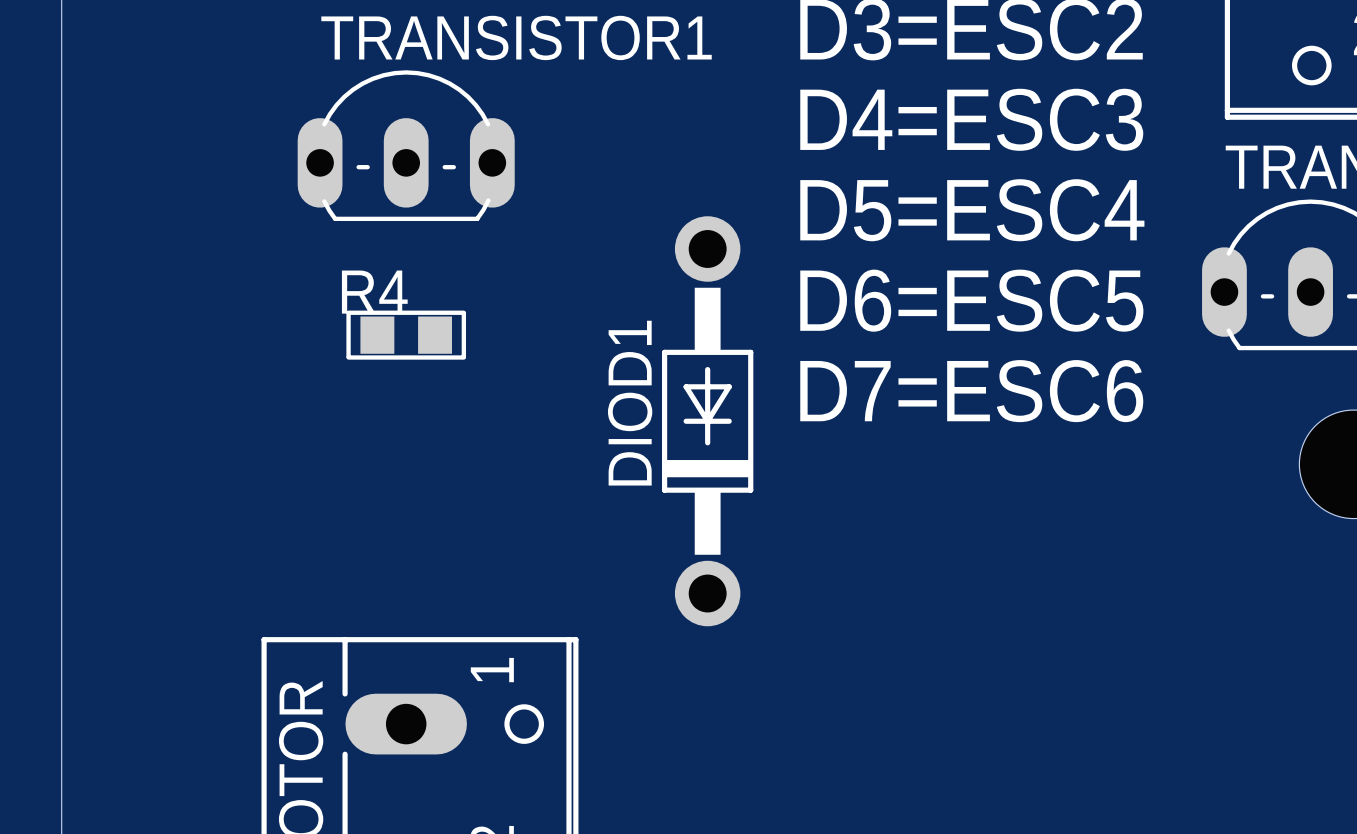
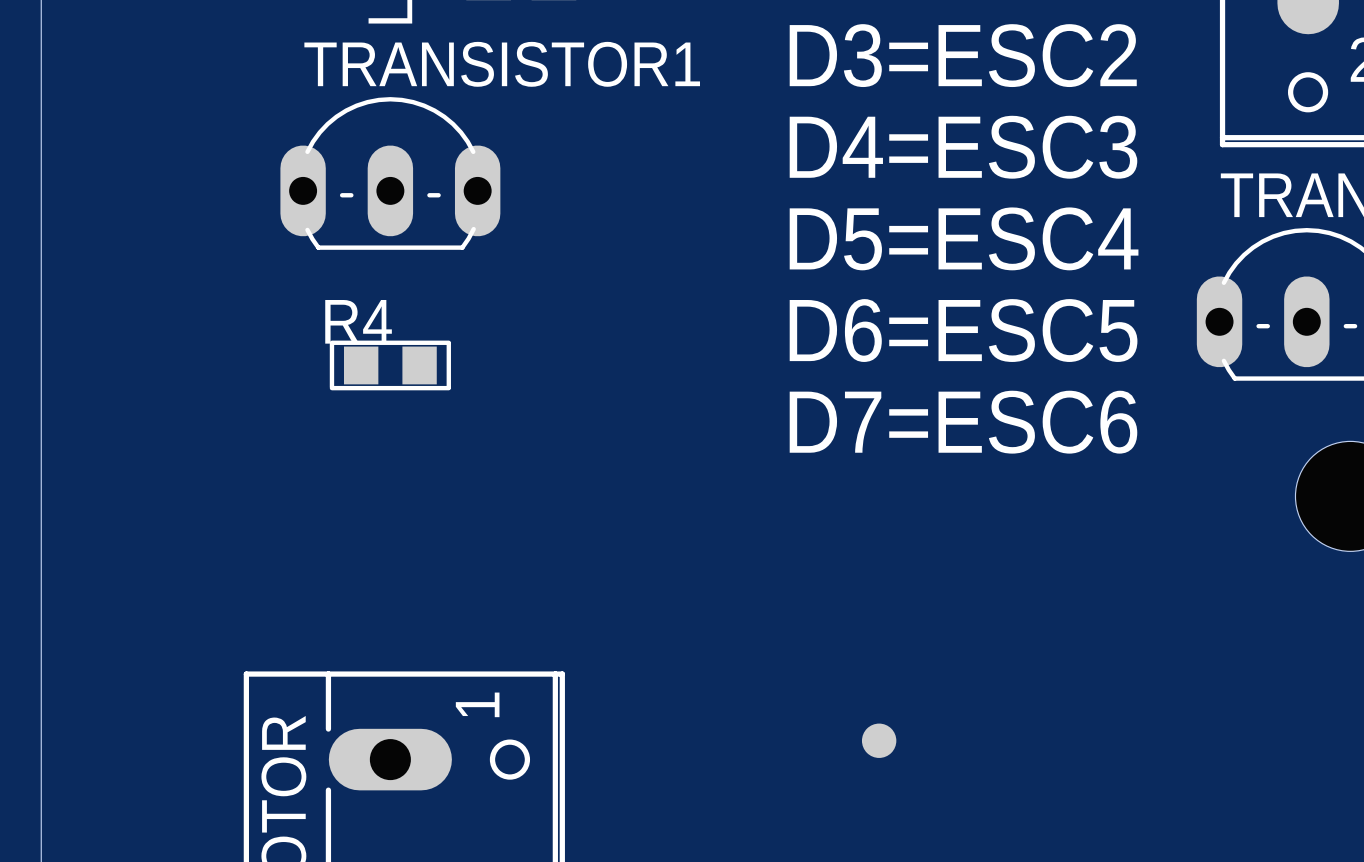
DIOD1: (707, 421) -> none
part: none -> (879, 740)

